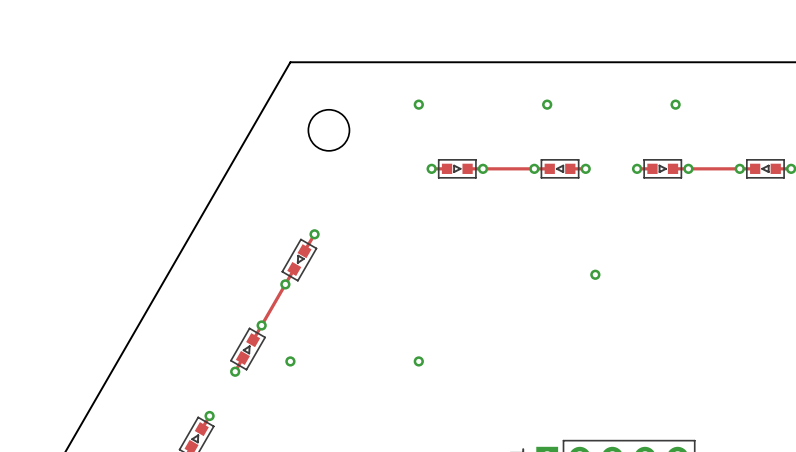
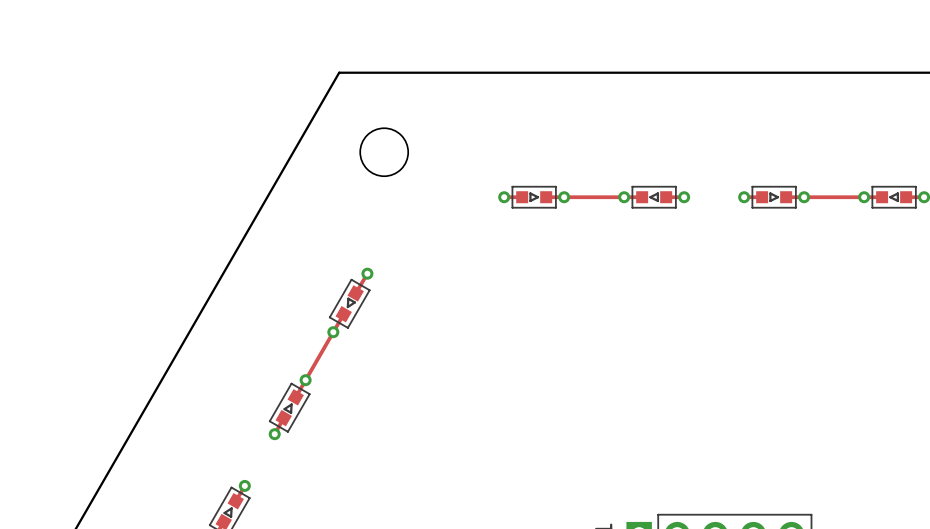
via: (418, 104) -> none
via: (547, 104) -> none
via: (675, 104) -> none
via: (595, 274) -> none
via: (290, 361) -> none
via: (418, 361) -> none

